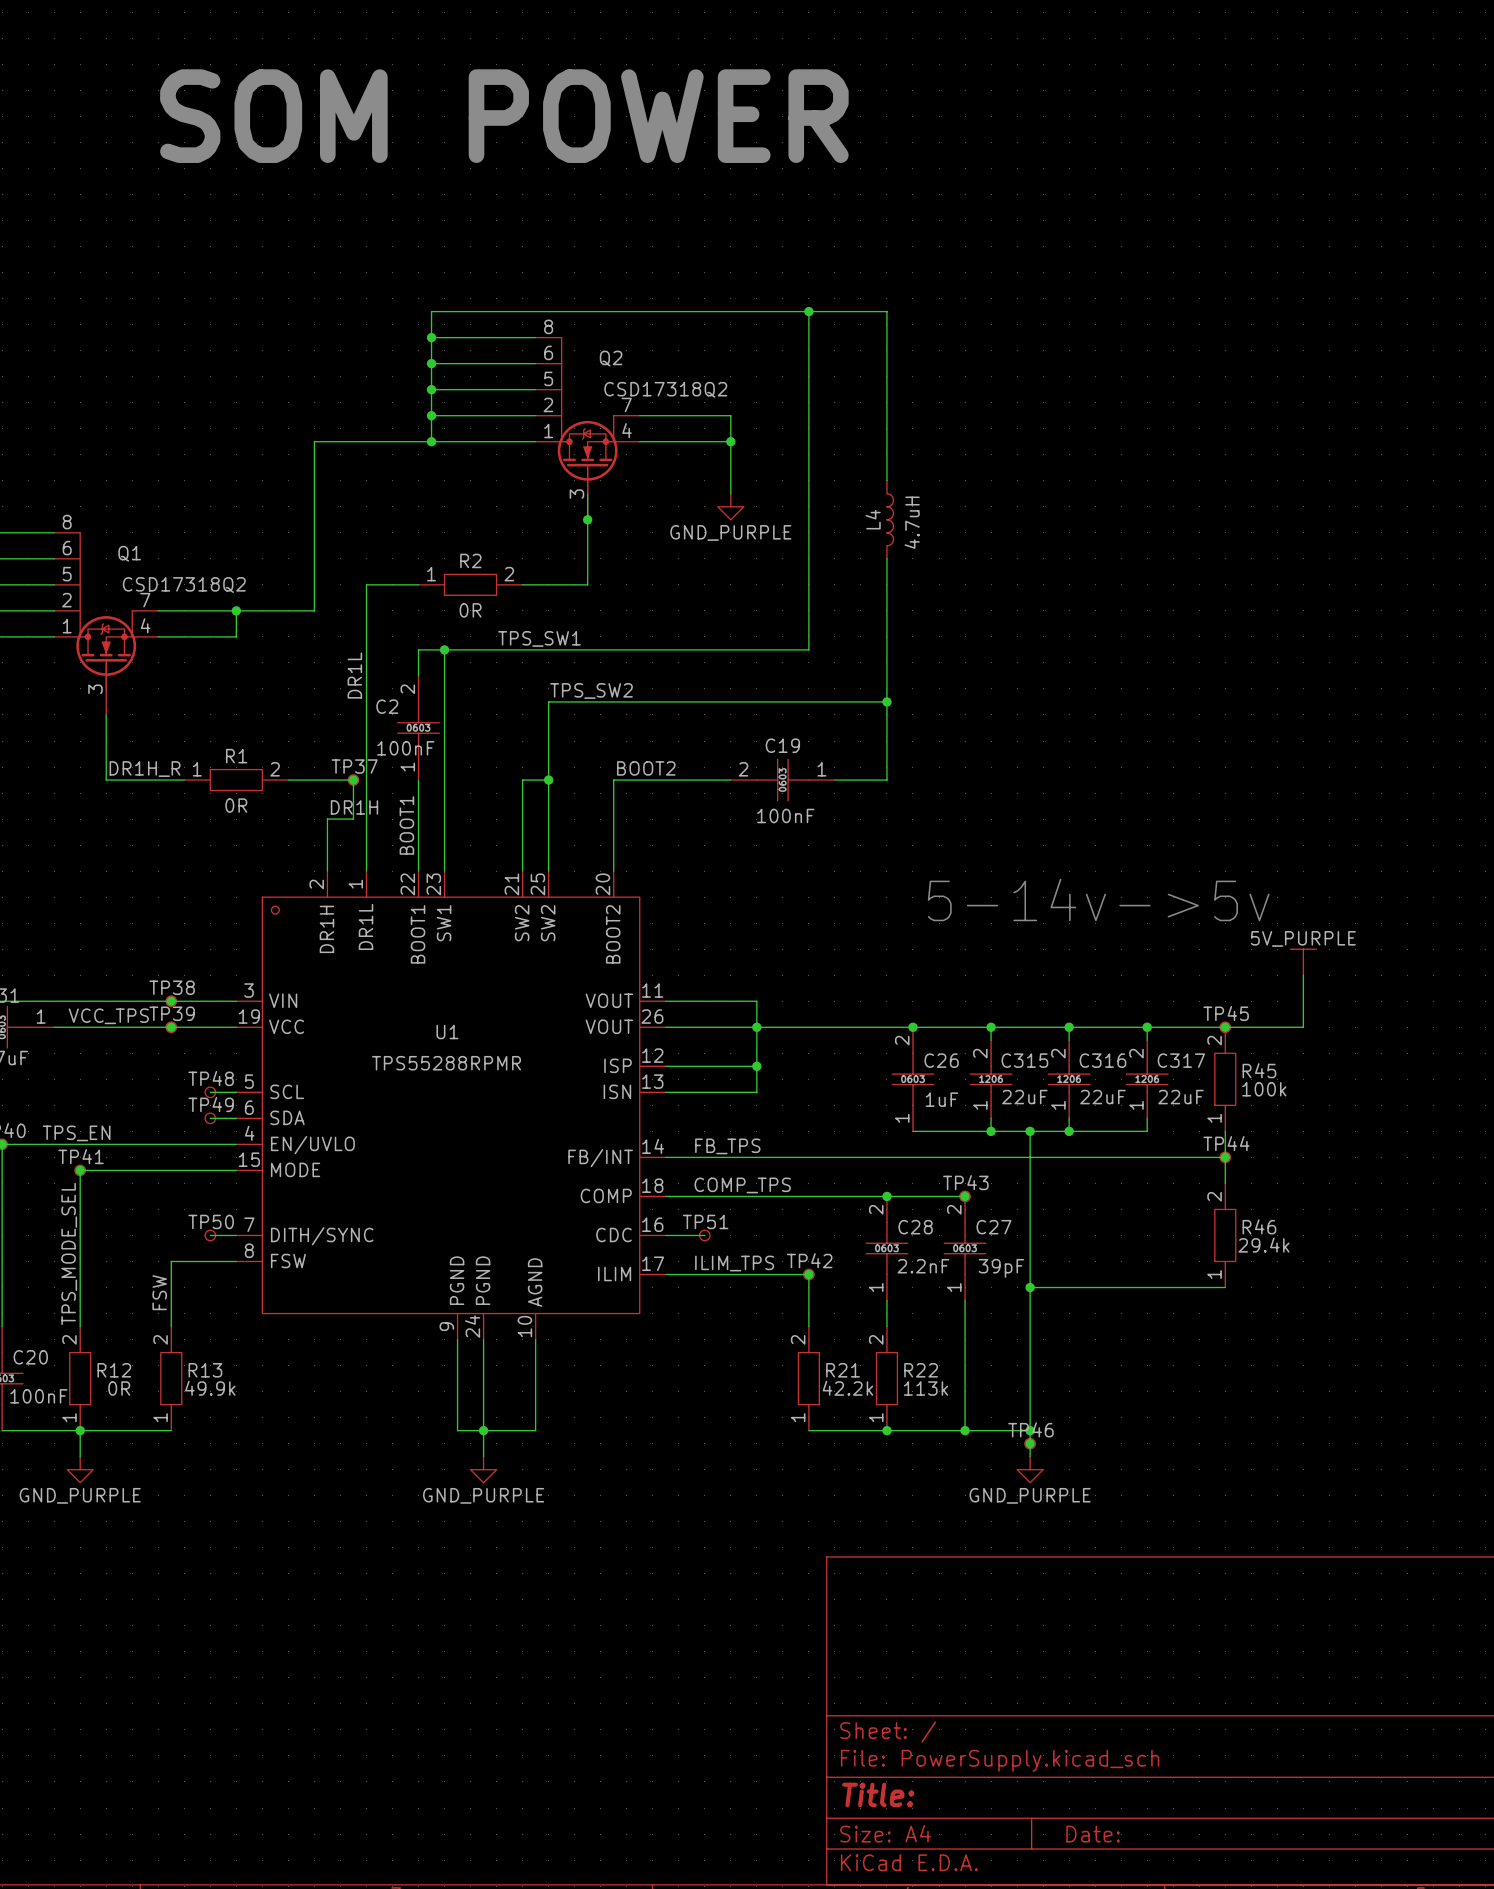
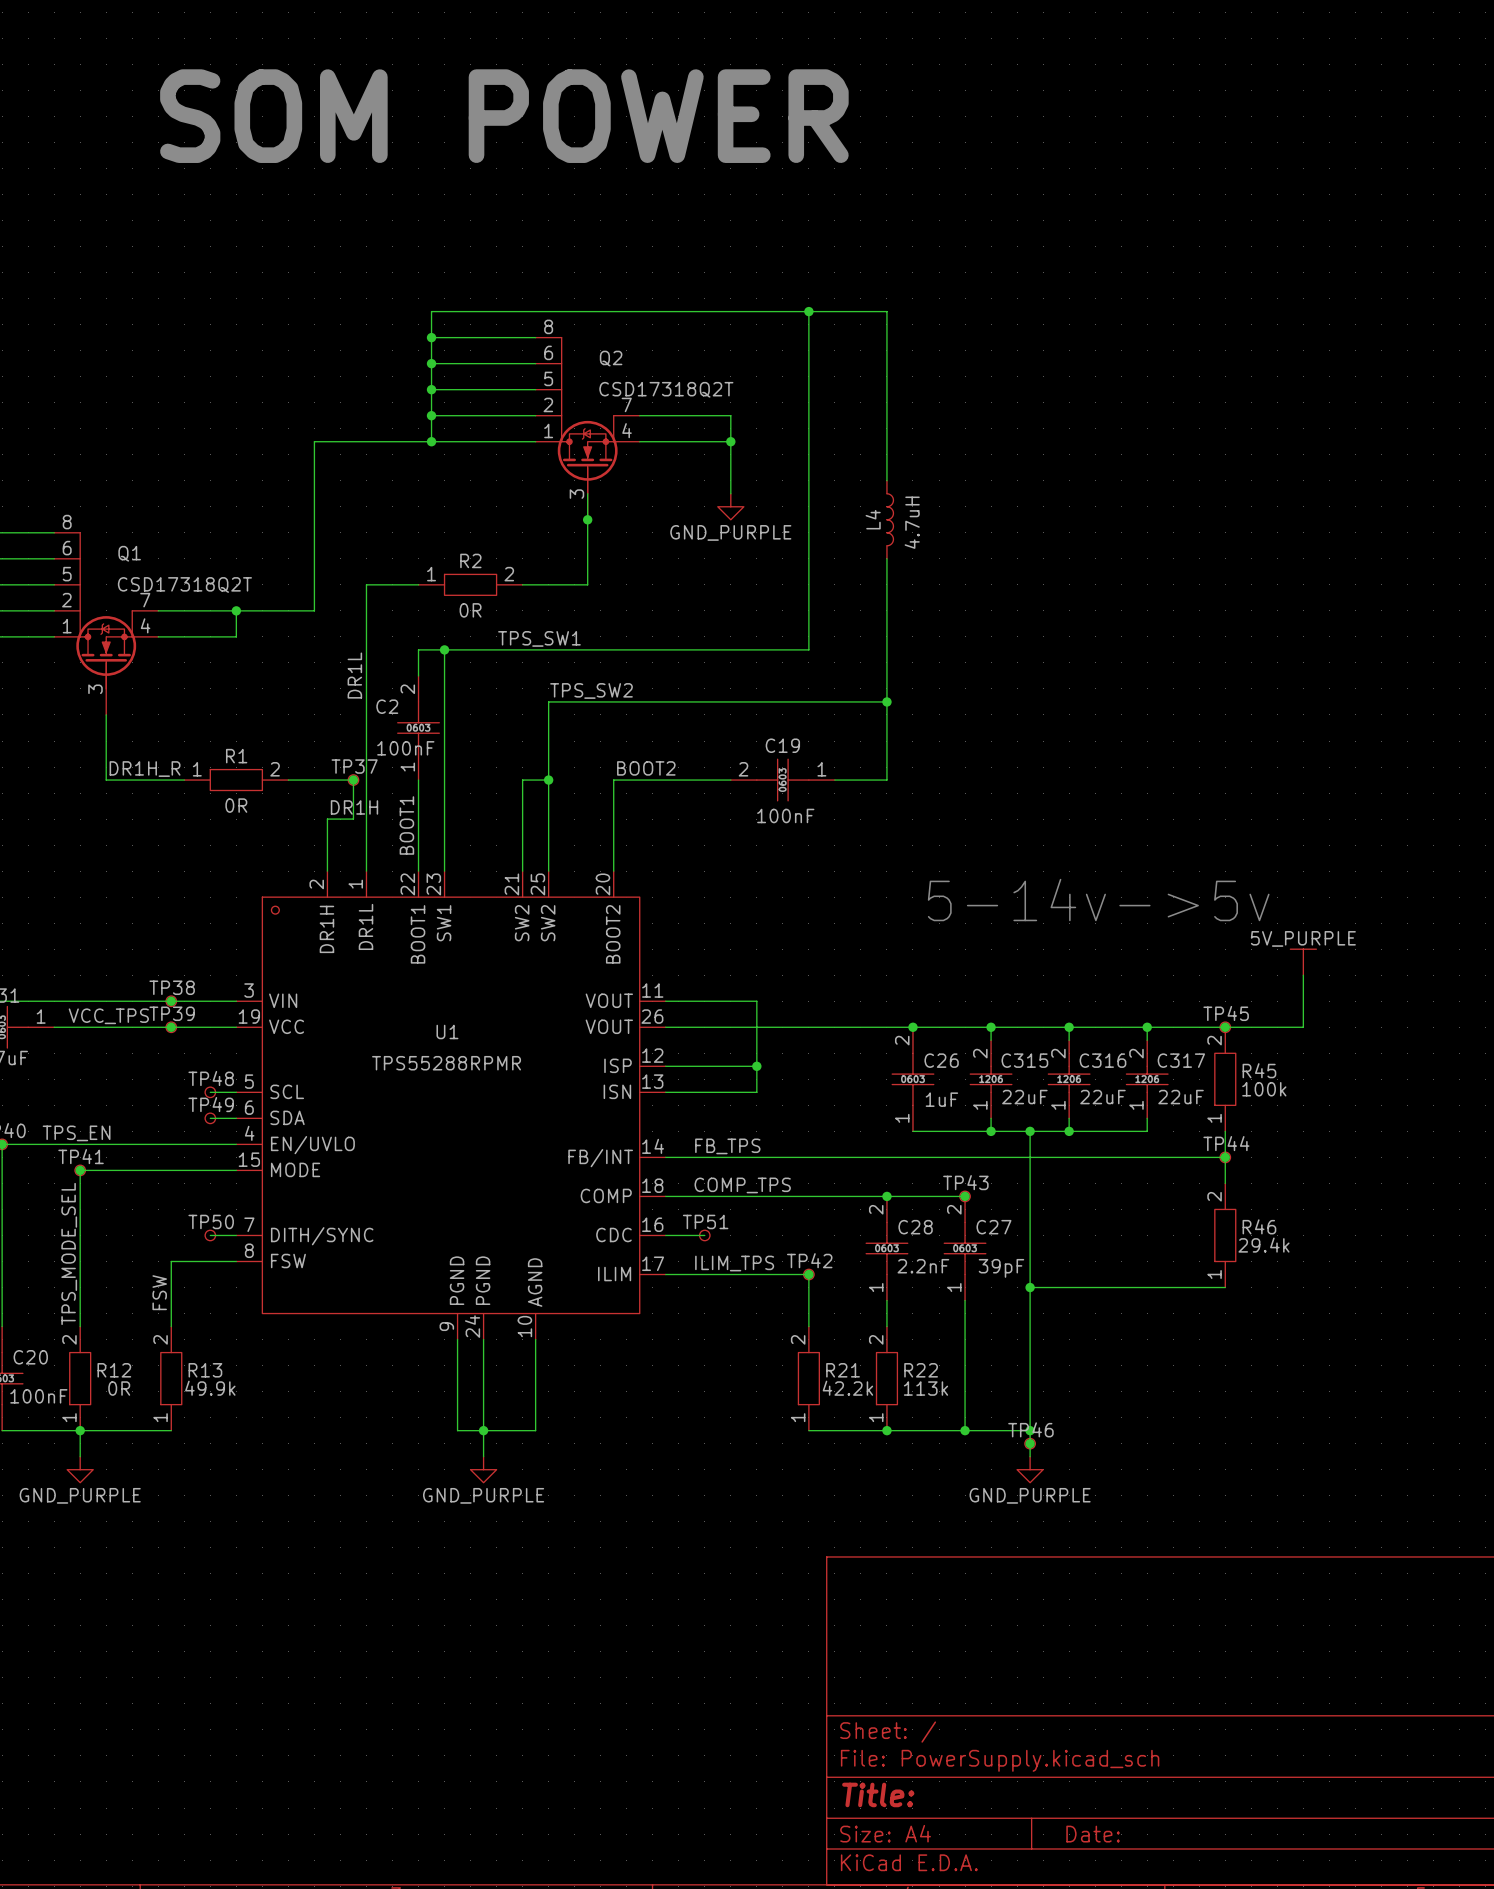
Q2 value: CSD17318Q2 (665, 389) -> CSD17318Q2T (666, 389)
Q1 value: CSD17318Q2 (184, 584) -> CSD17318Q2T (184, 584)
junction: (756, 1027) -> none

